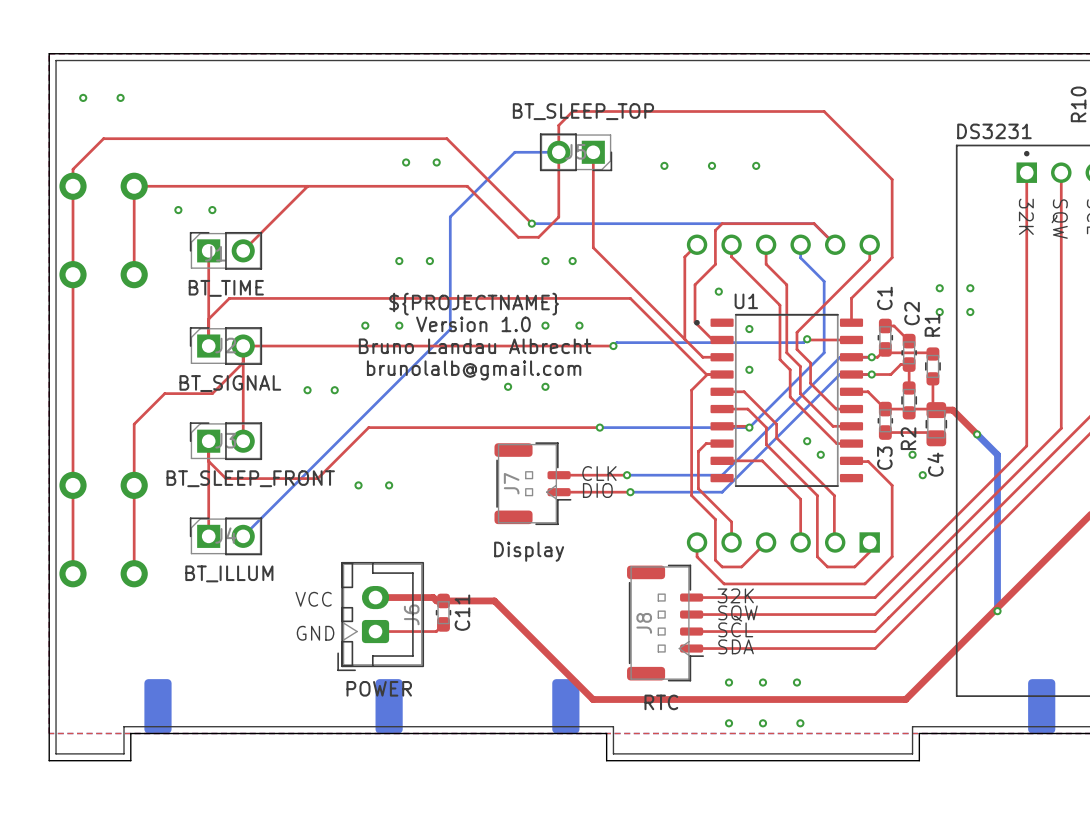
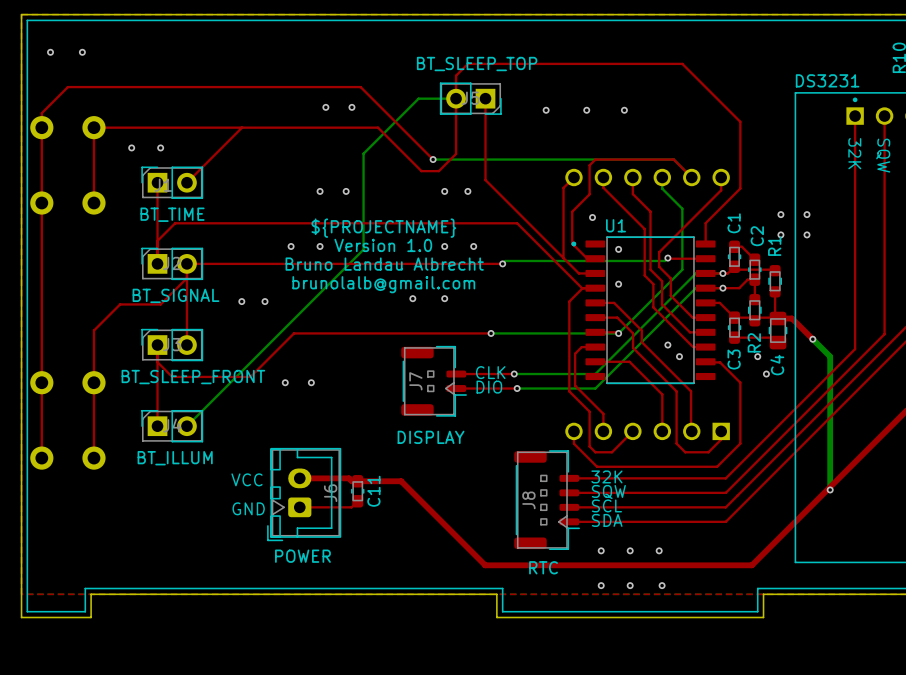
J7 text: Display (529, 551) -> DISPLAY (431, 437)
part: (157, 706) -> none
part: (389, 706) -> none
part: (565, 706) -> none
part: (1041, 706) -> none

